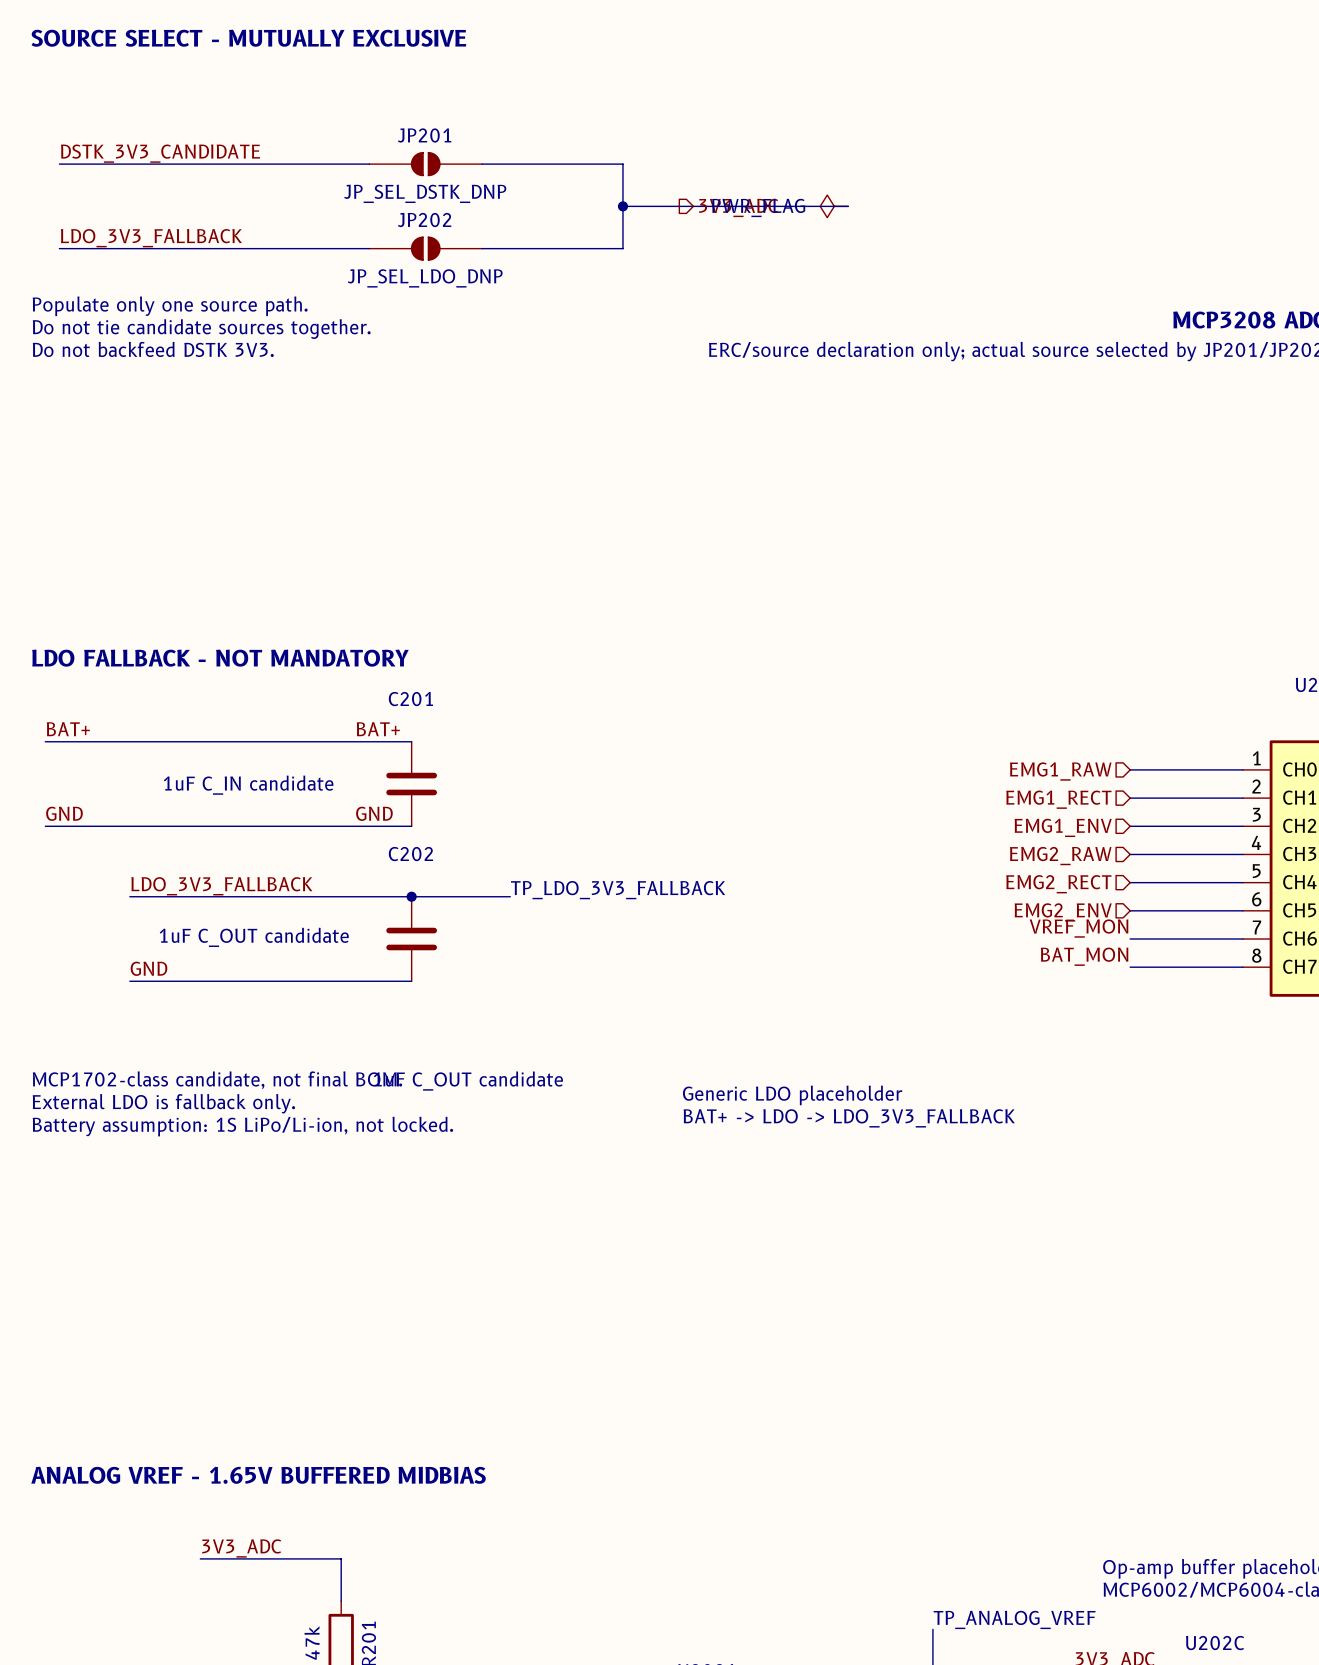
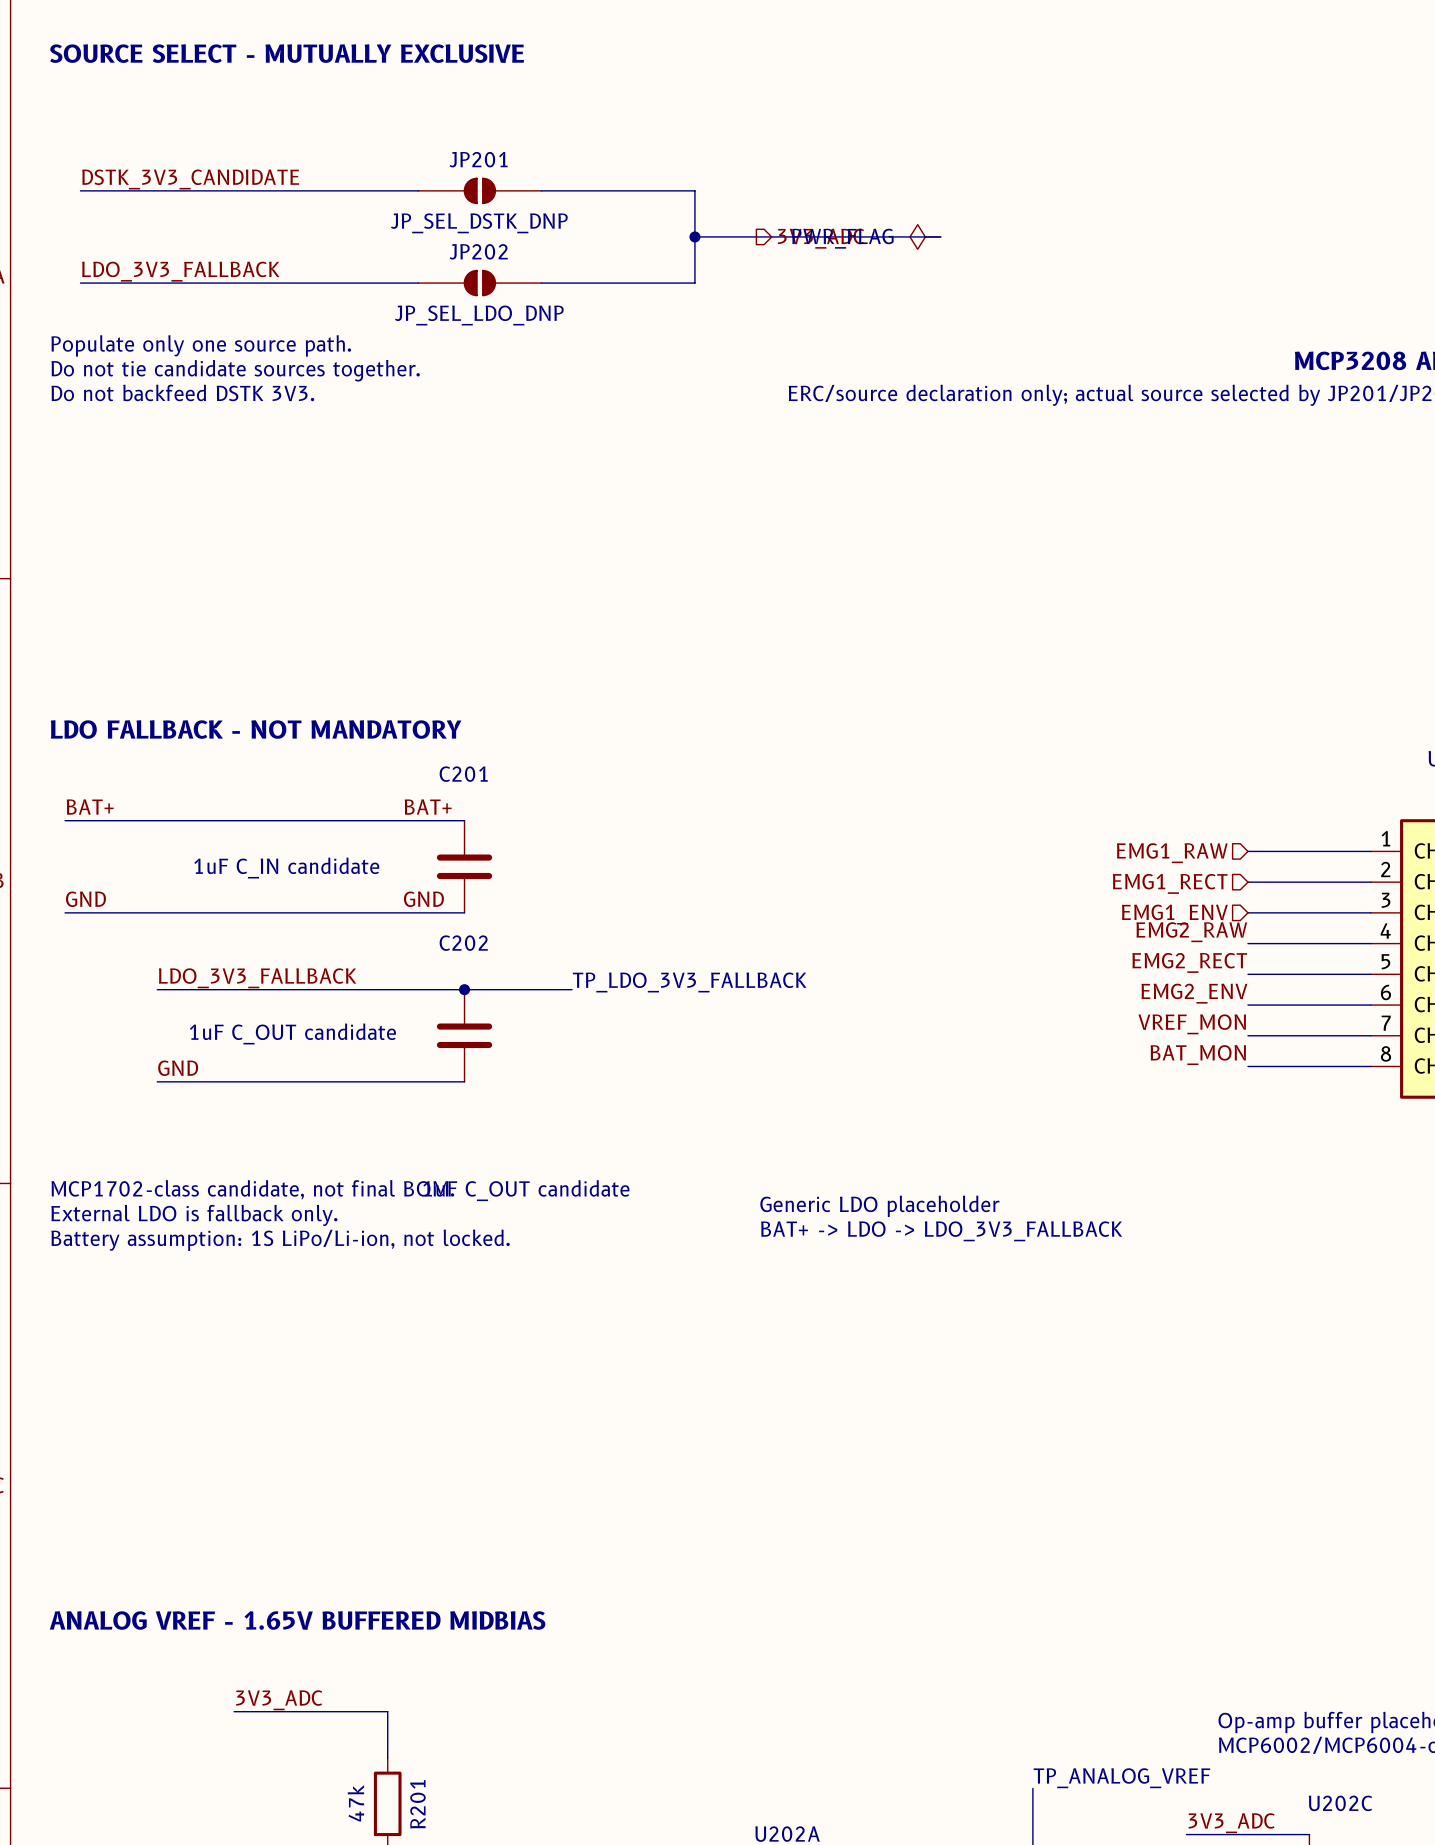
label: none -> EMG2_RAW (1191, 932)
hierarchical label: EMG2_RAW (1060, 856) -> none
label: none -> EMG2_RECT (1189, 962)
hierarchical label: EMG2_RECT (1058, 884) -> none
label: none -> EMG2_ENV (1194, 993)
hierarchical label: EMG2_ENV (1063, 912) -> none

